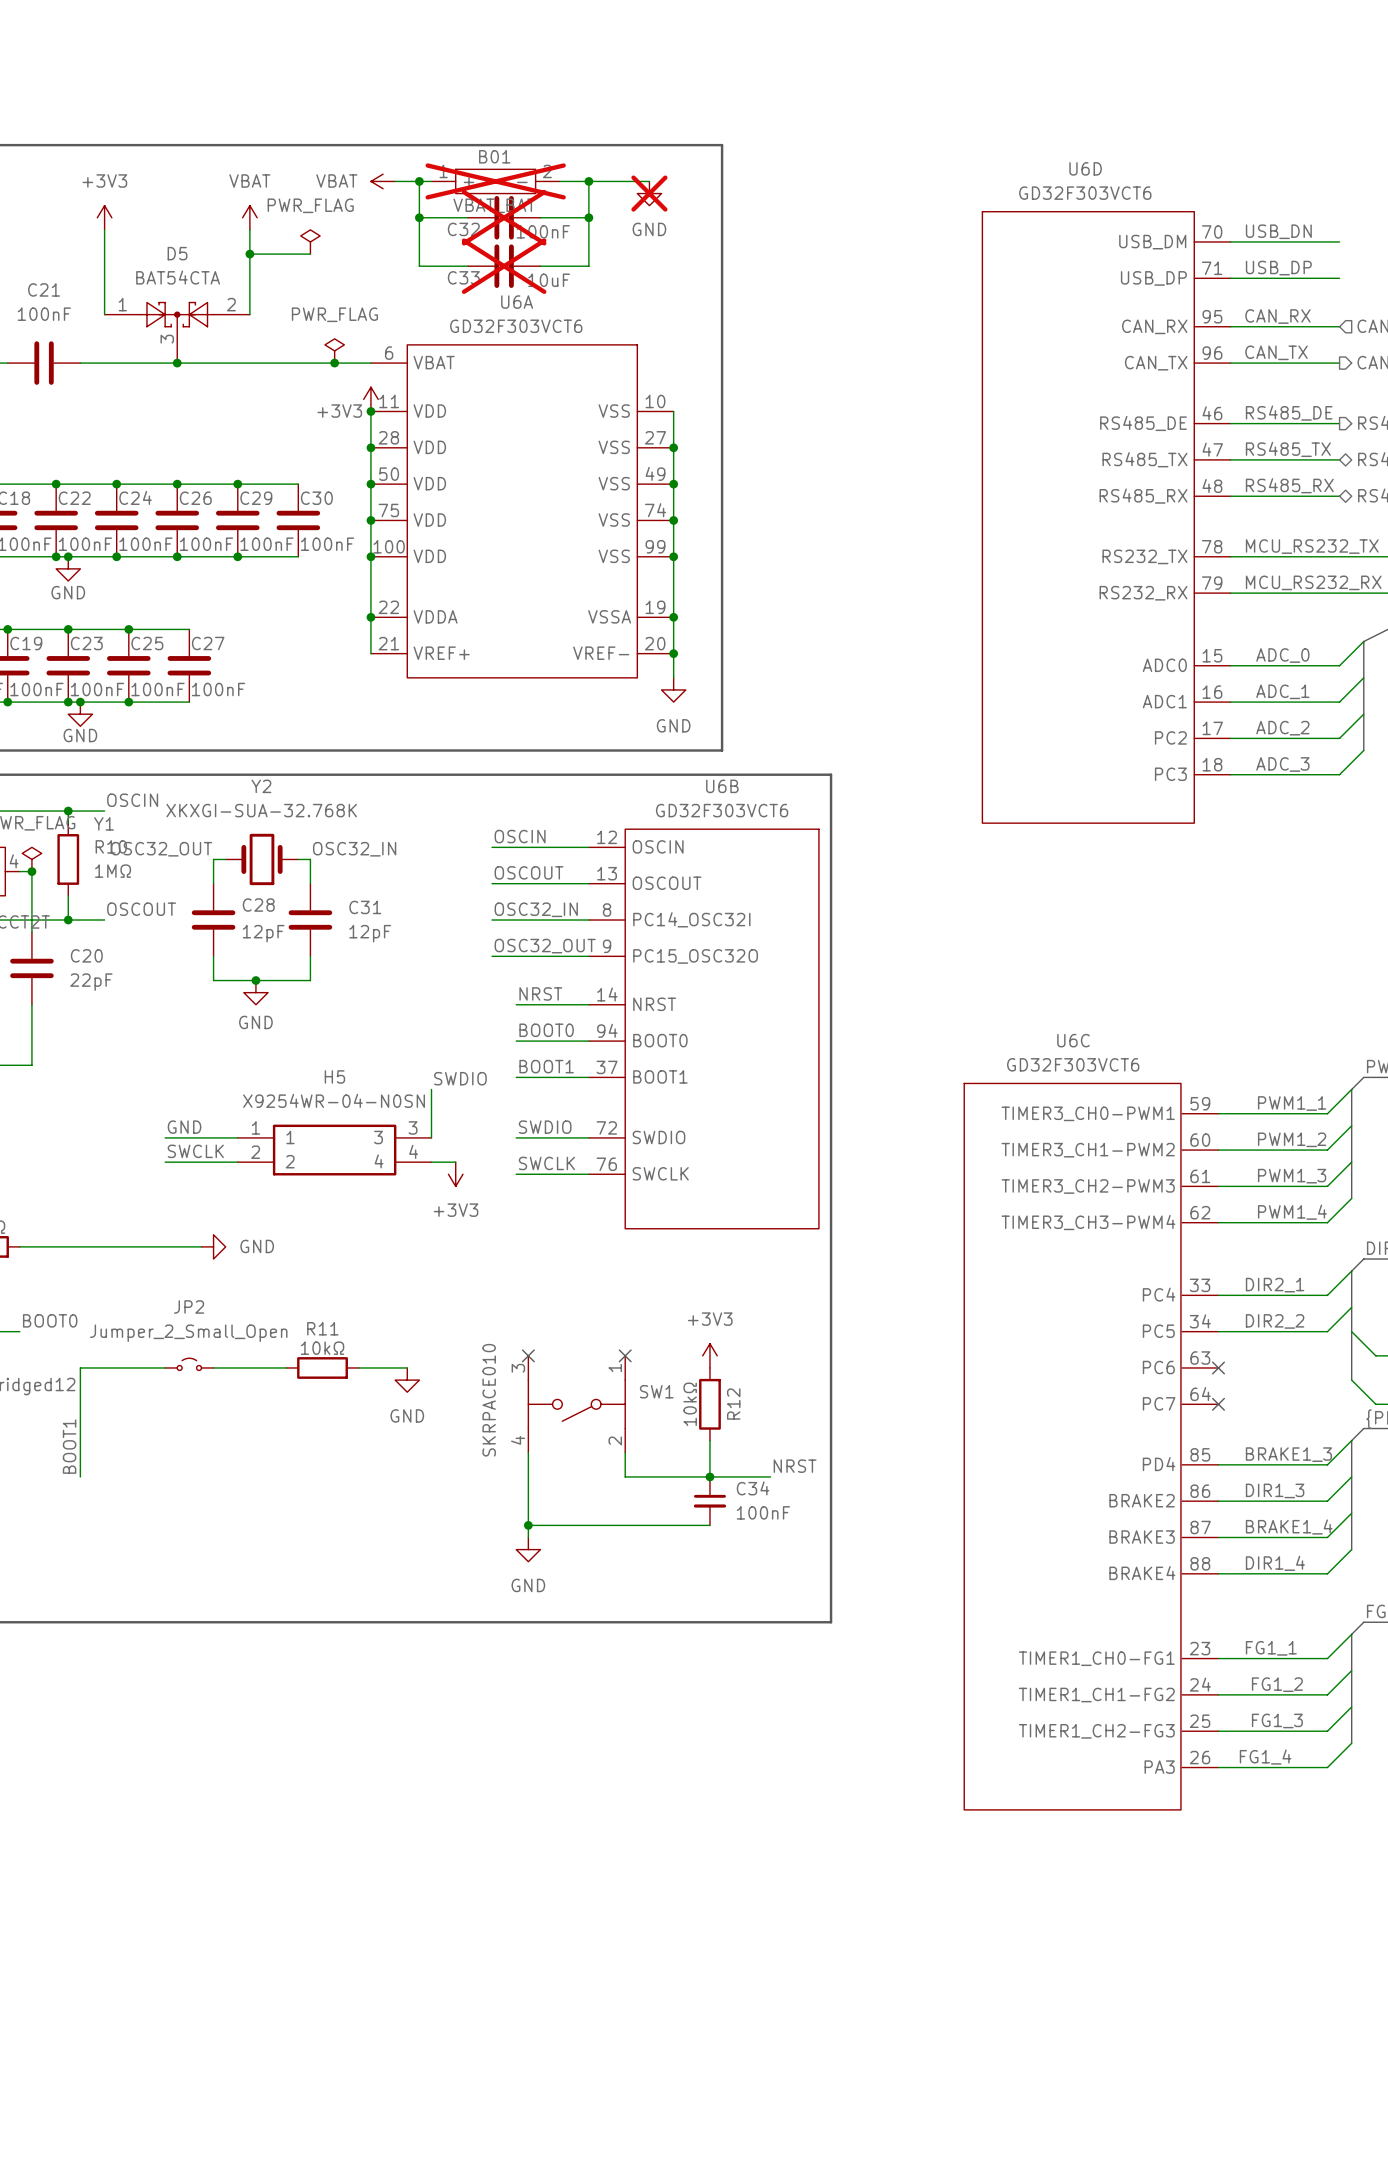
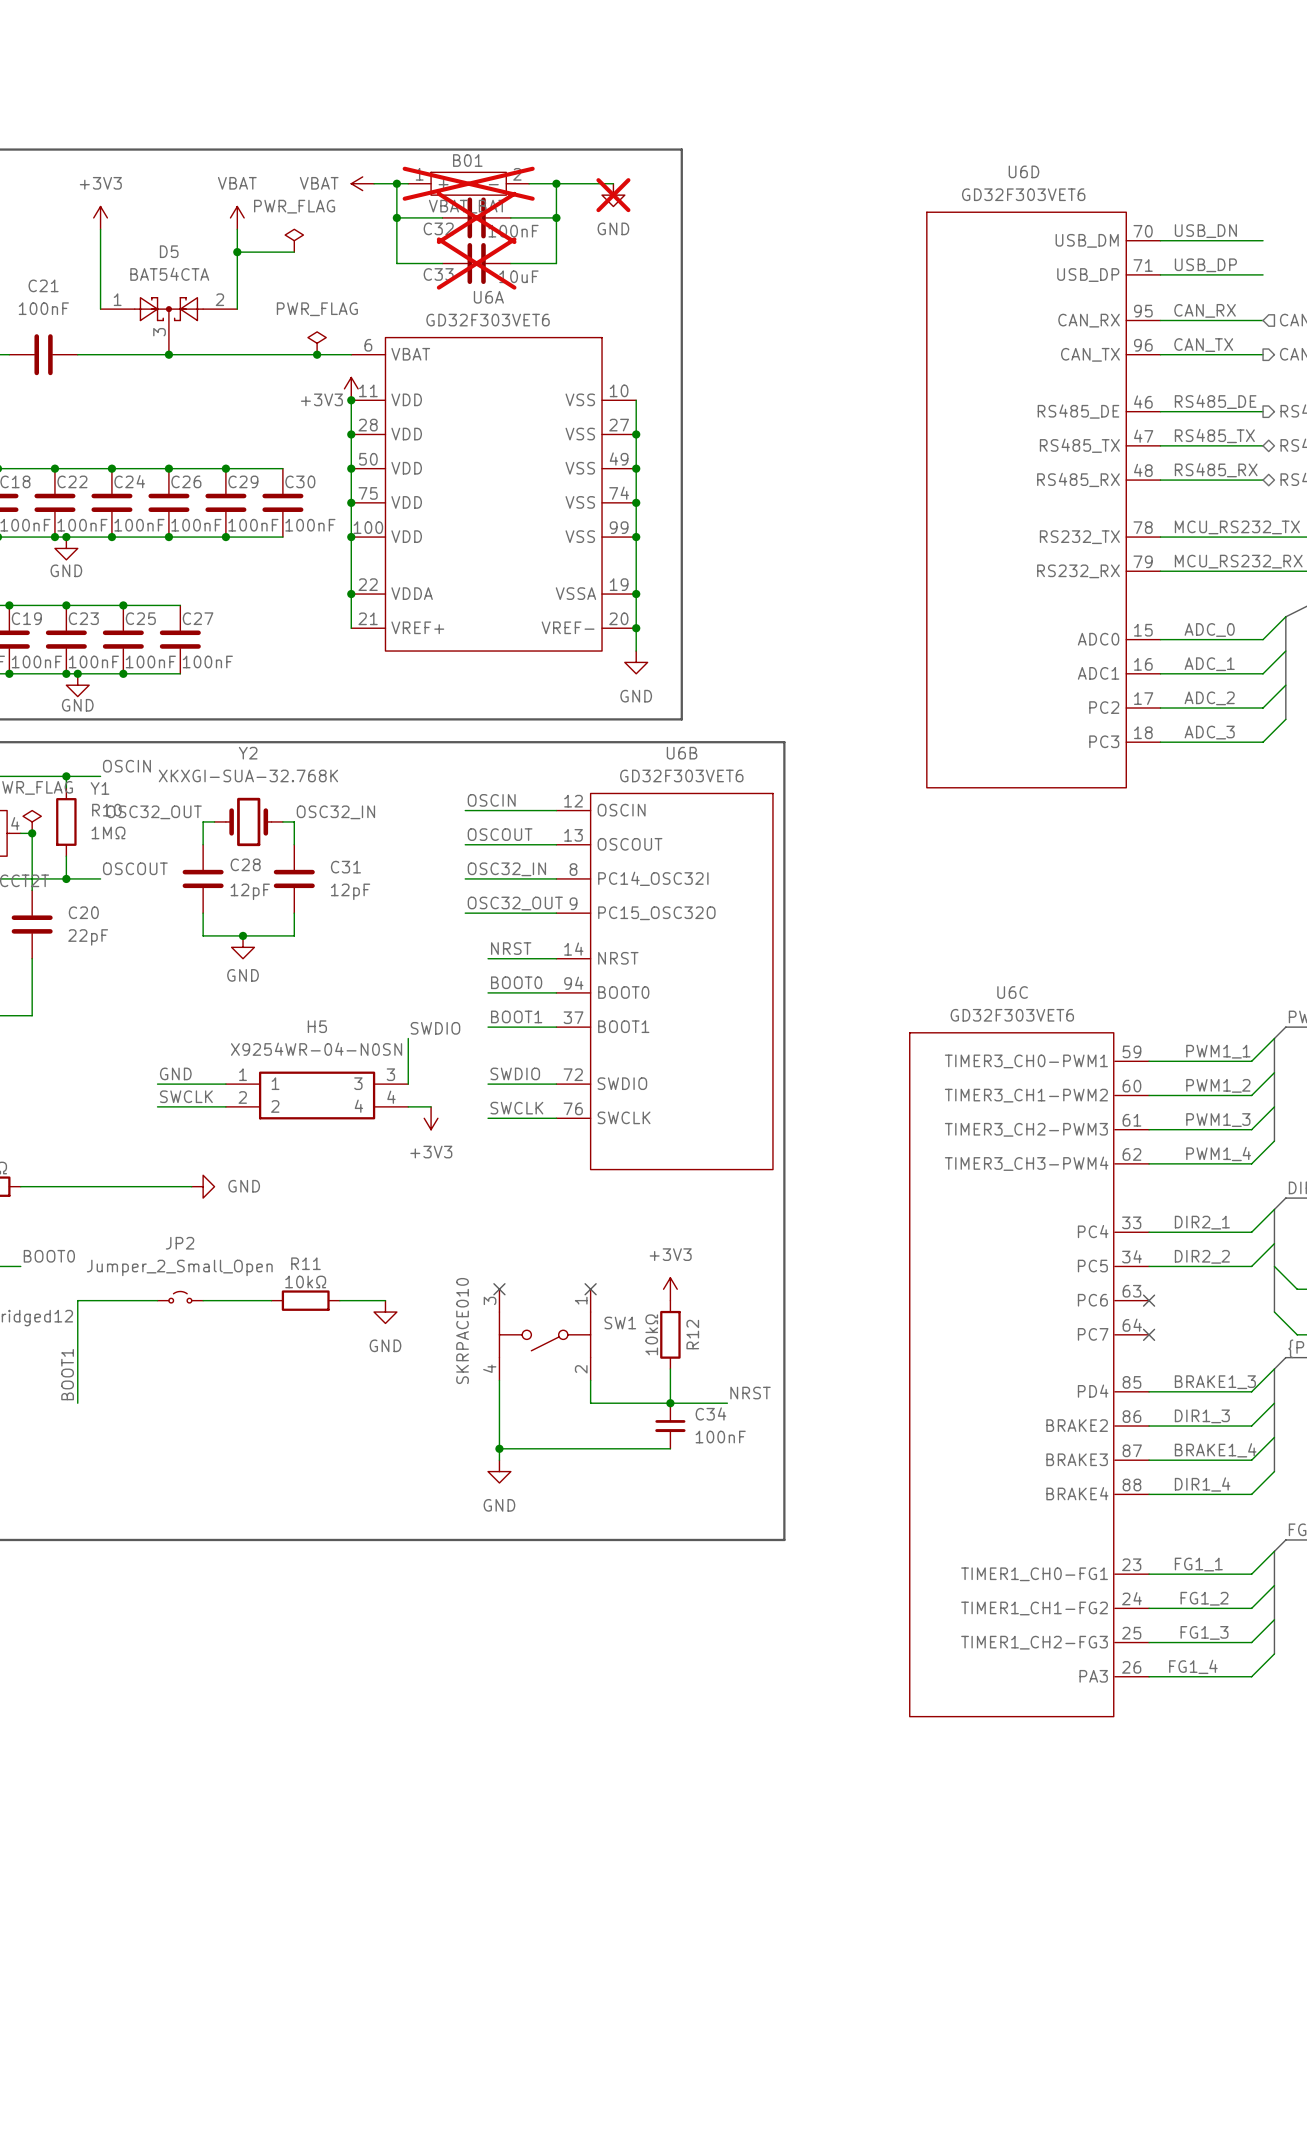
U6D value: GD32F303VCT6 (1085, 193) -> GD32F303VET6 (1023, 194)
U6A value: GD32F303VCT6 (516, 326) -> GD32F303VET6 (488, 320)
U6B value: GD32F303VCT6 (722, 810) -> GD32F303VET6 (681, 775)
U6C value: GD32F303VCT6 (1073, 1064) -> GD32F303VET6 (1012, 1015)

